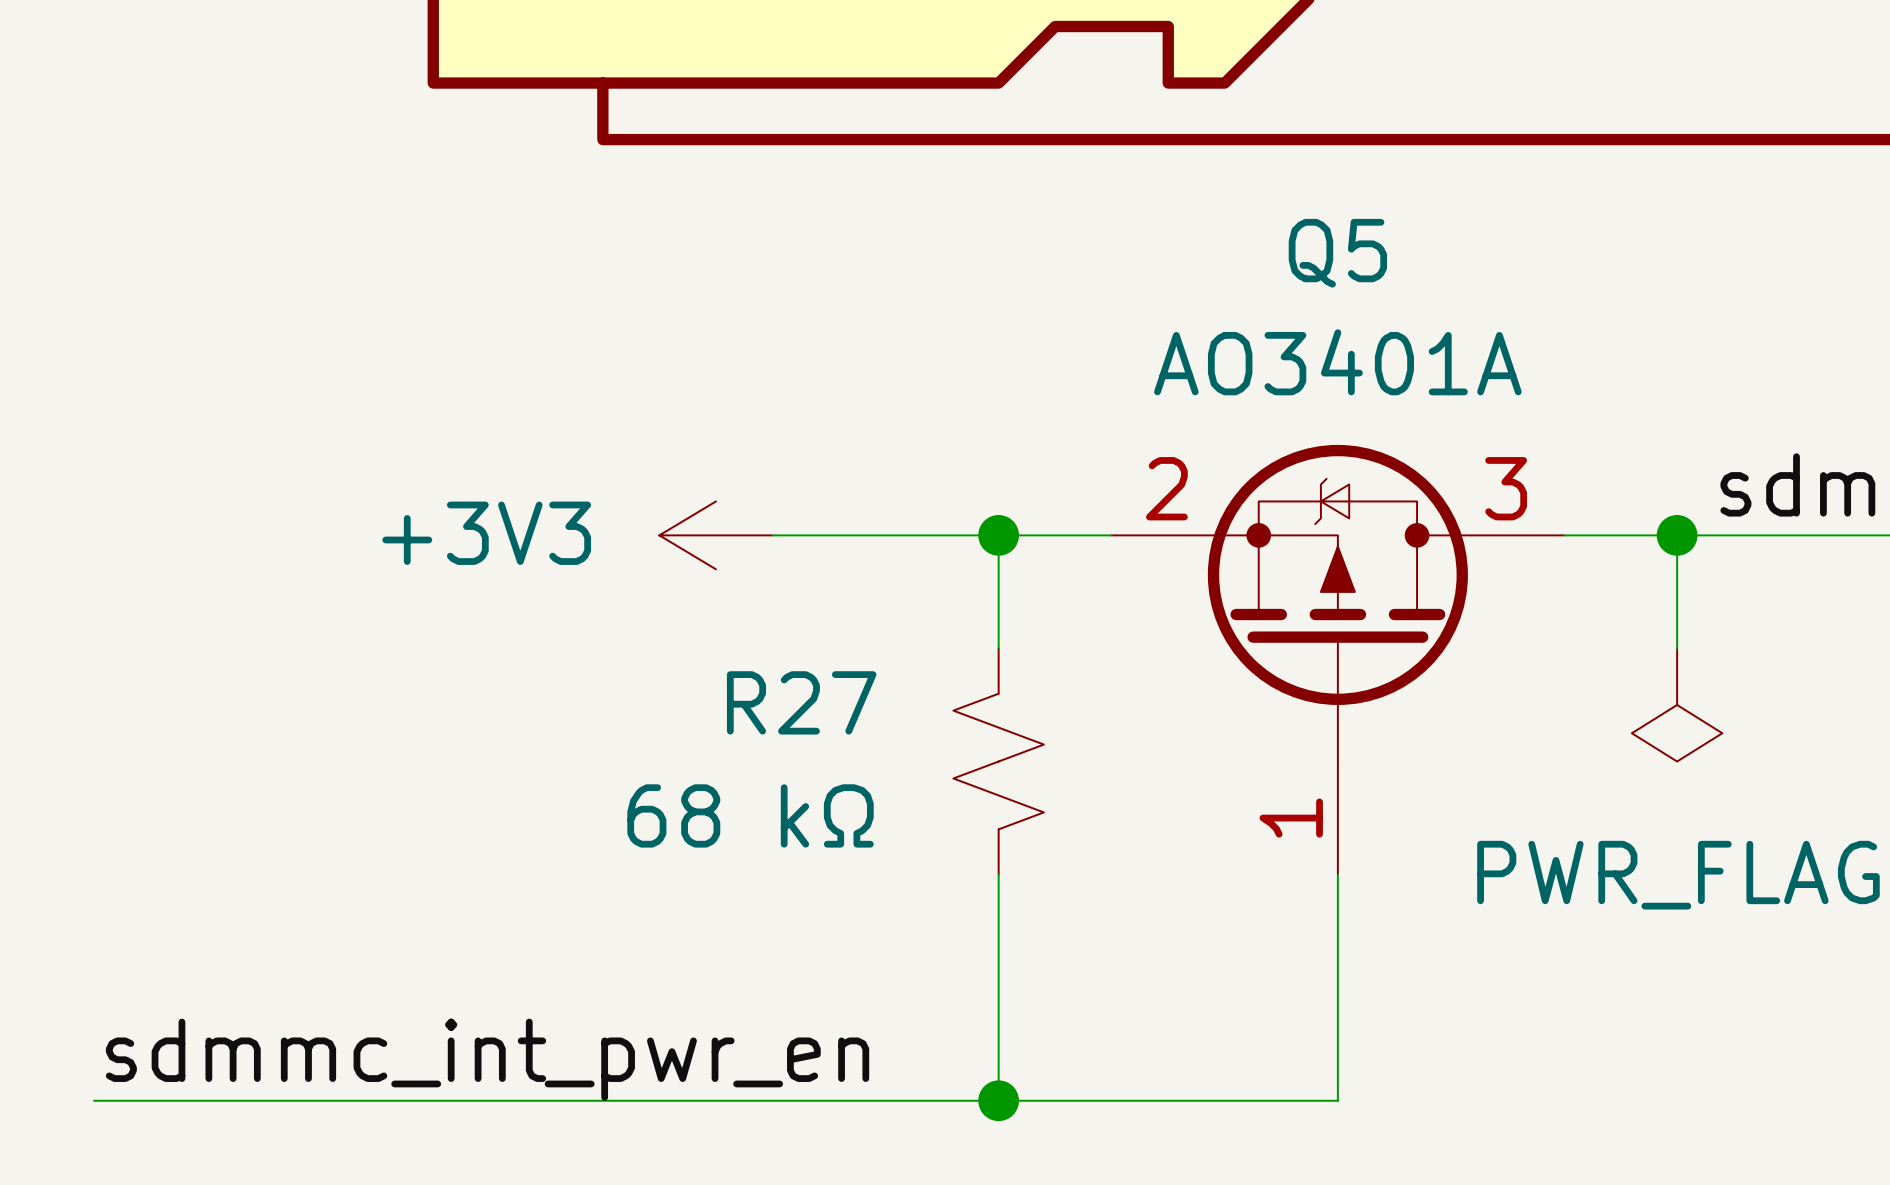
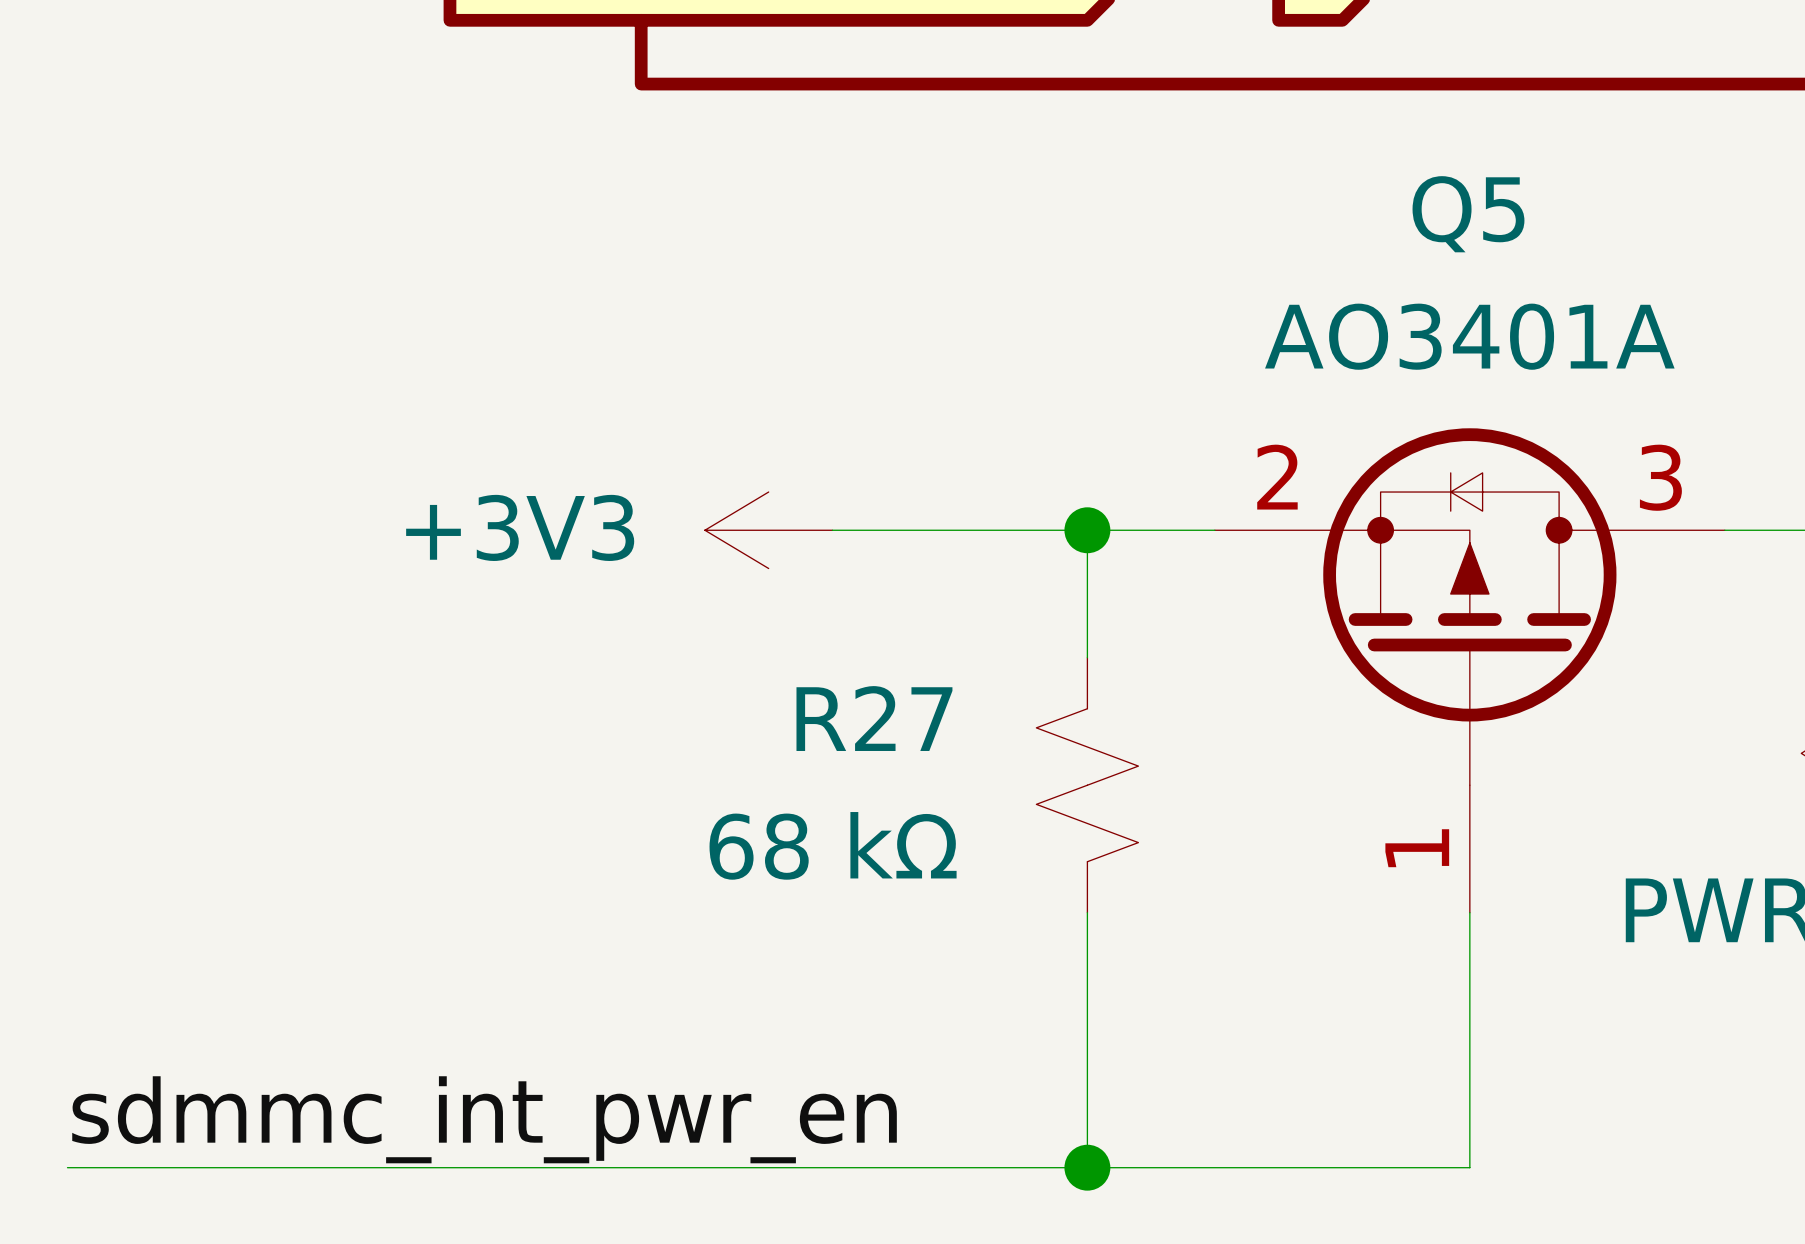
Q5 symbol: [1111, 444, 1565, 875] -> [1214, 428, 1725, 913]

